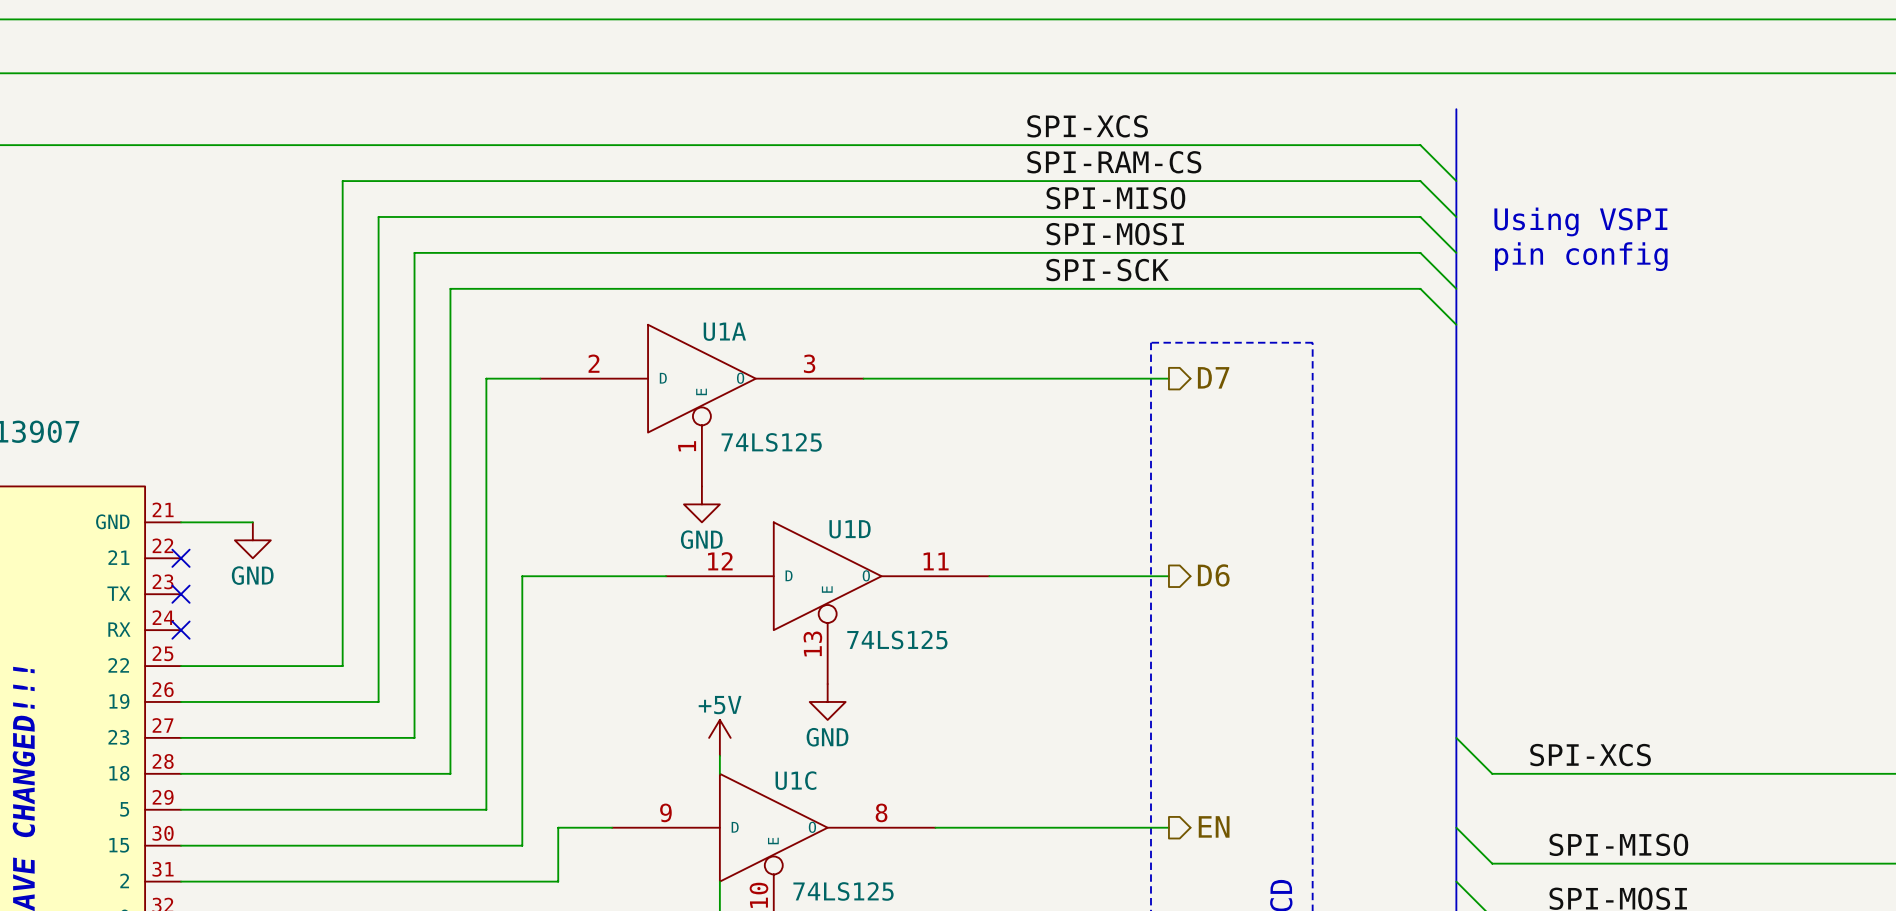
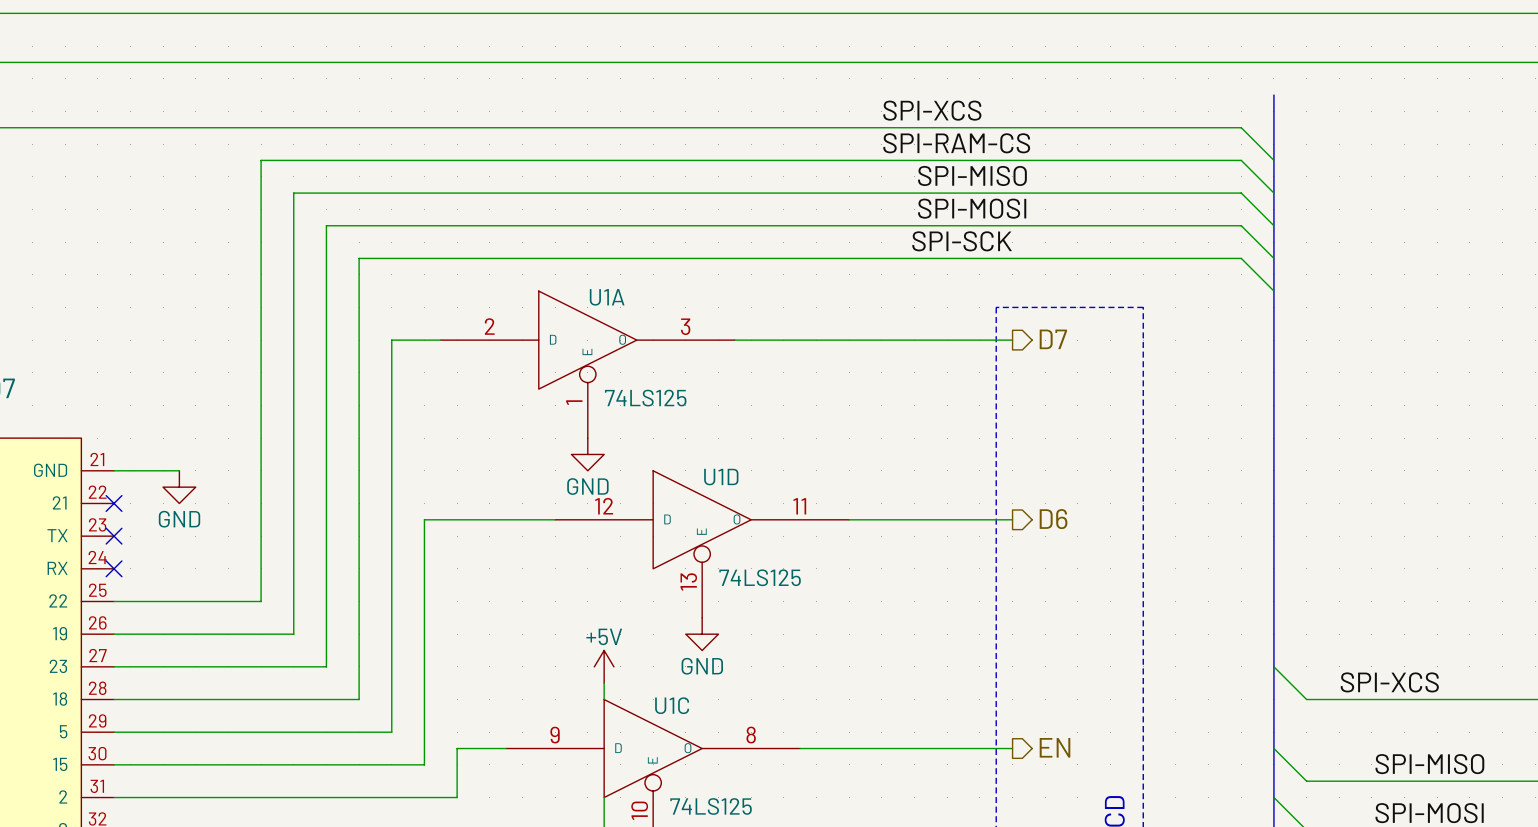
text: Using VSPI (1580, 221) -> none
text: pin config (1581, 256) -> none

